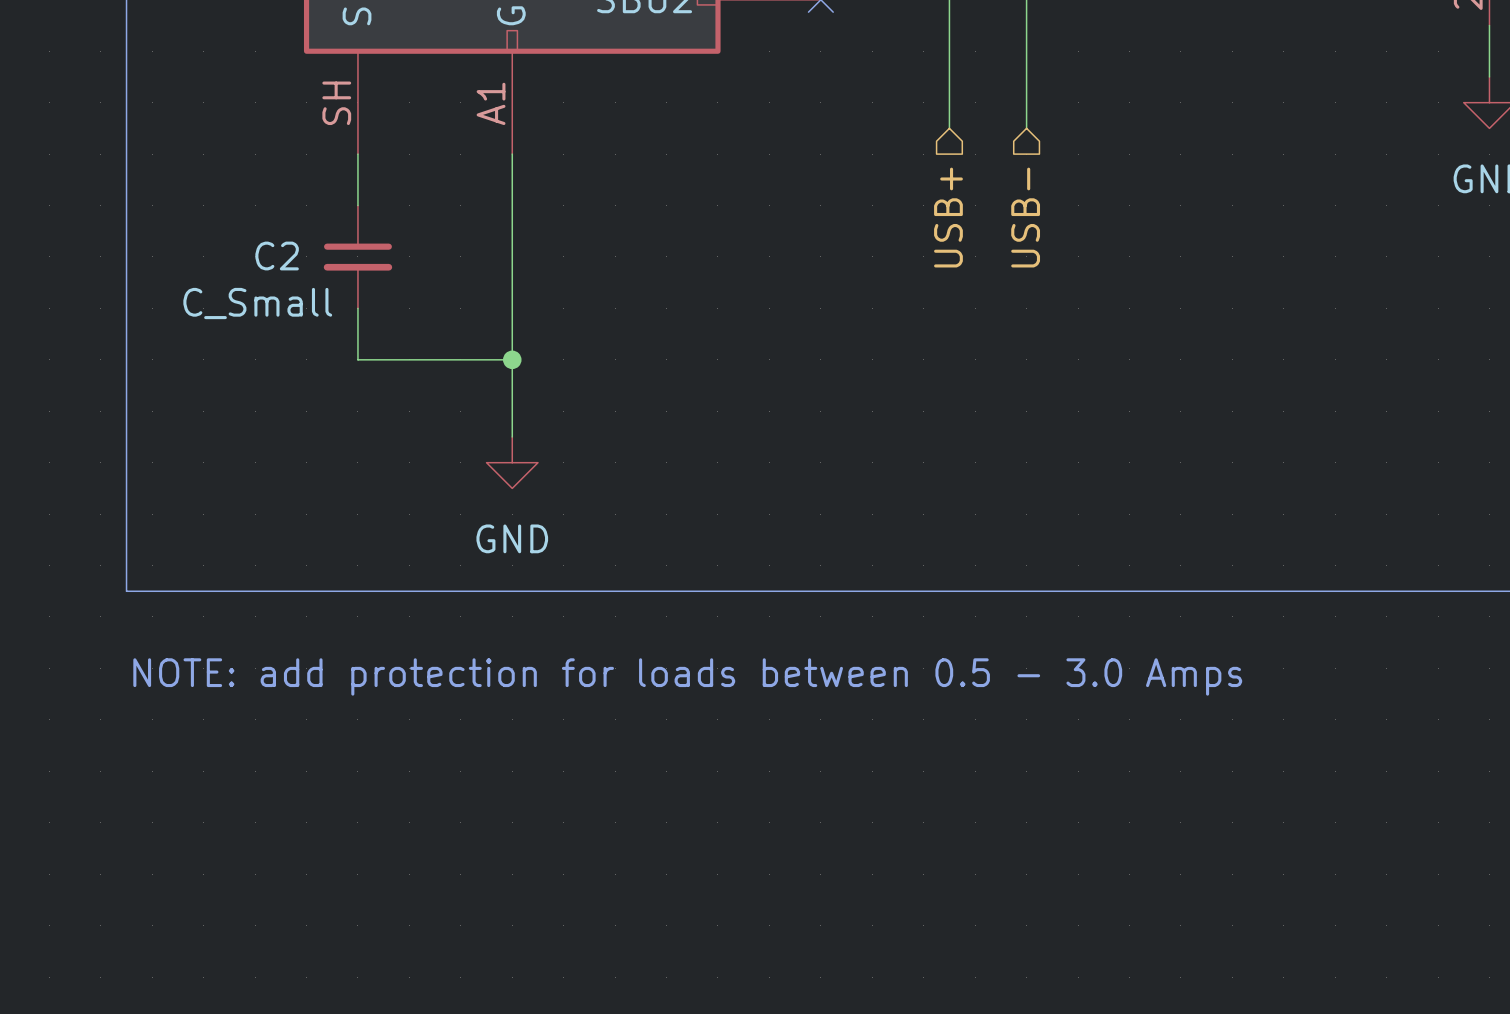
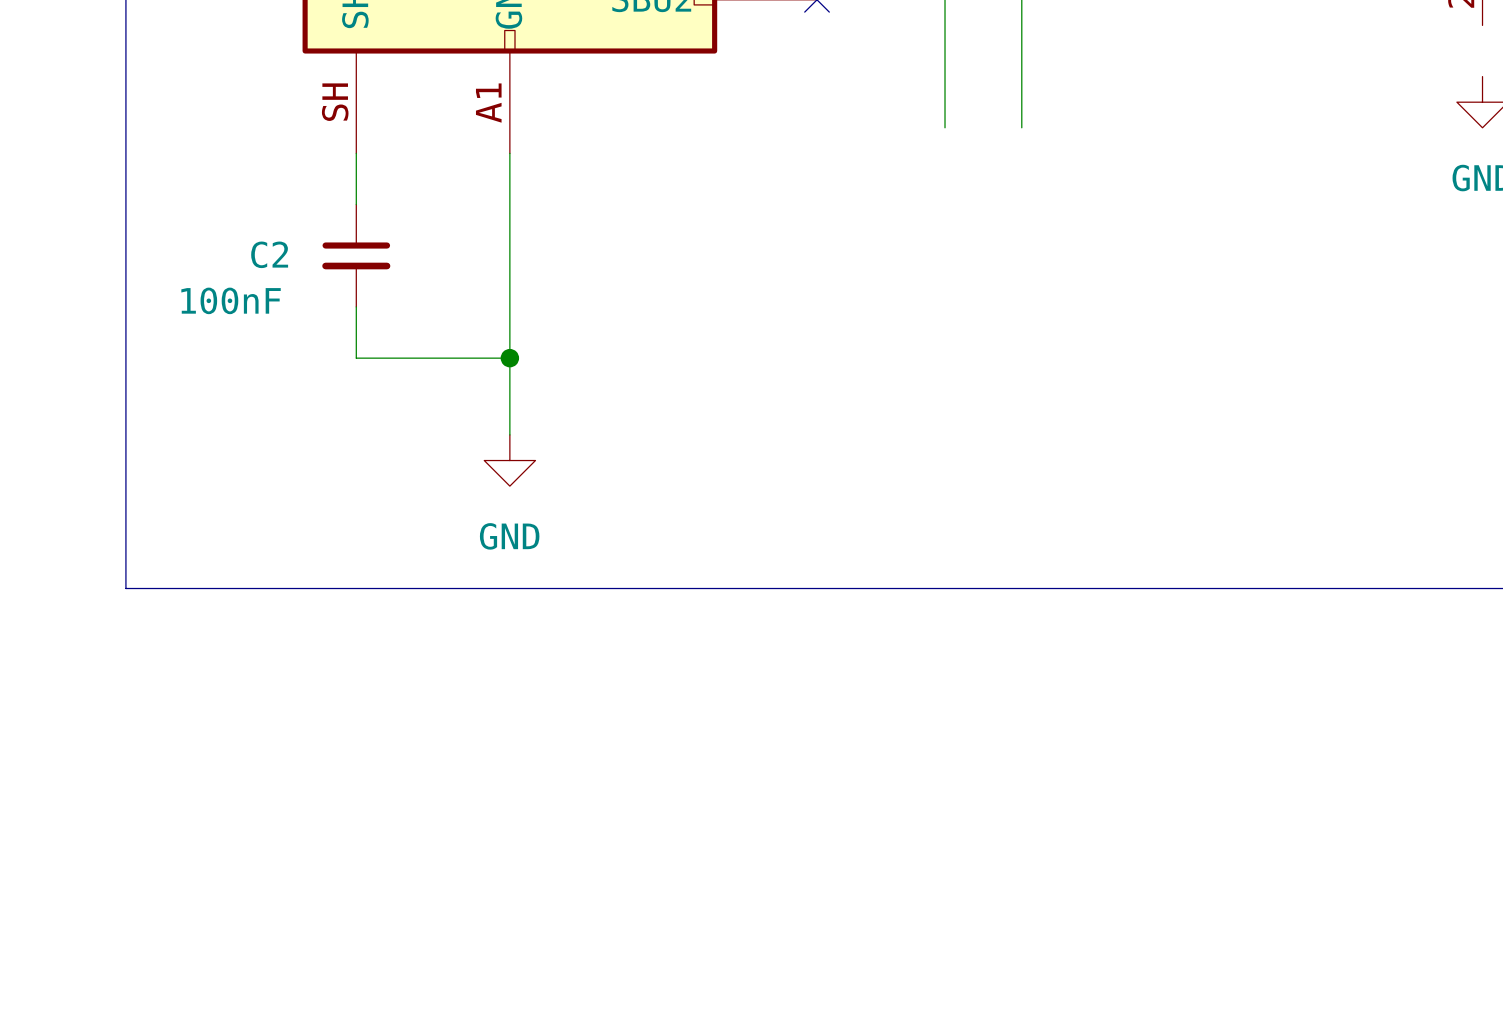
wire: (1489, 25) (1489, 76) -> none
hierarchical label: USB+ (948, 217) -> none
hierarchical label: USB- (1025, 217) -> none
C2 value: C_Small (257, 303) -> 100nF (231, 300)
text: NOTE: add protection for loads between 0.5 - 3.0 Amps (687, 676) -> none

